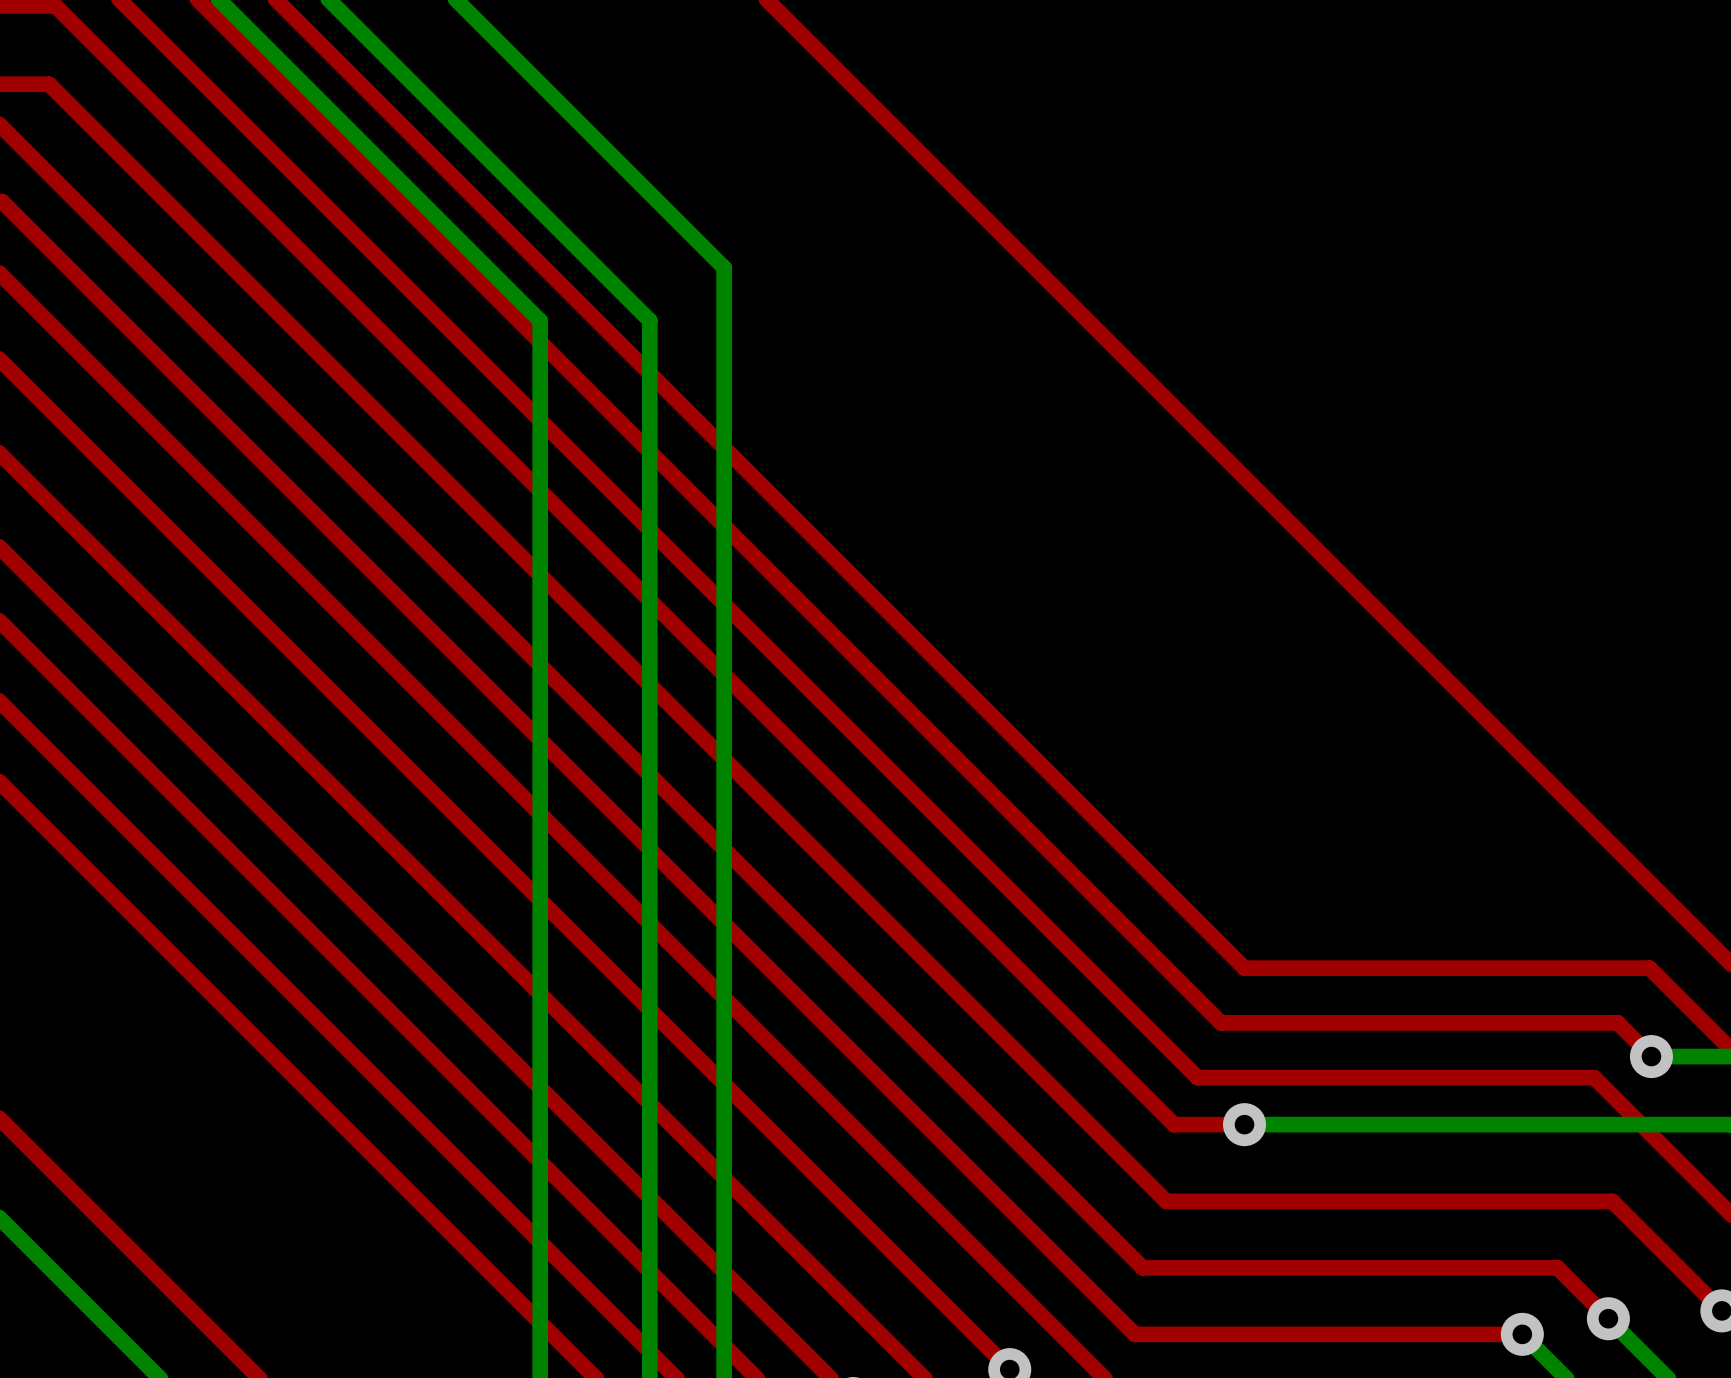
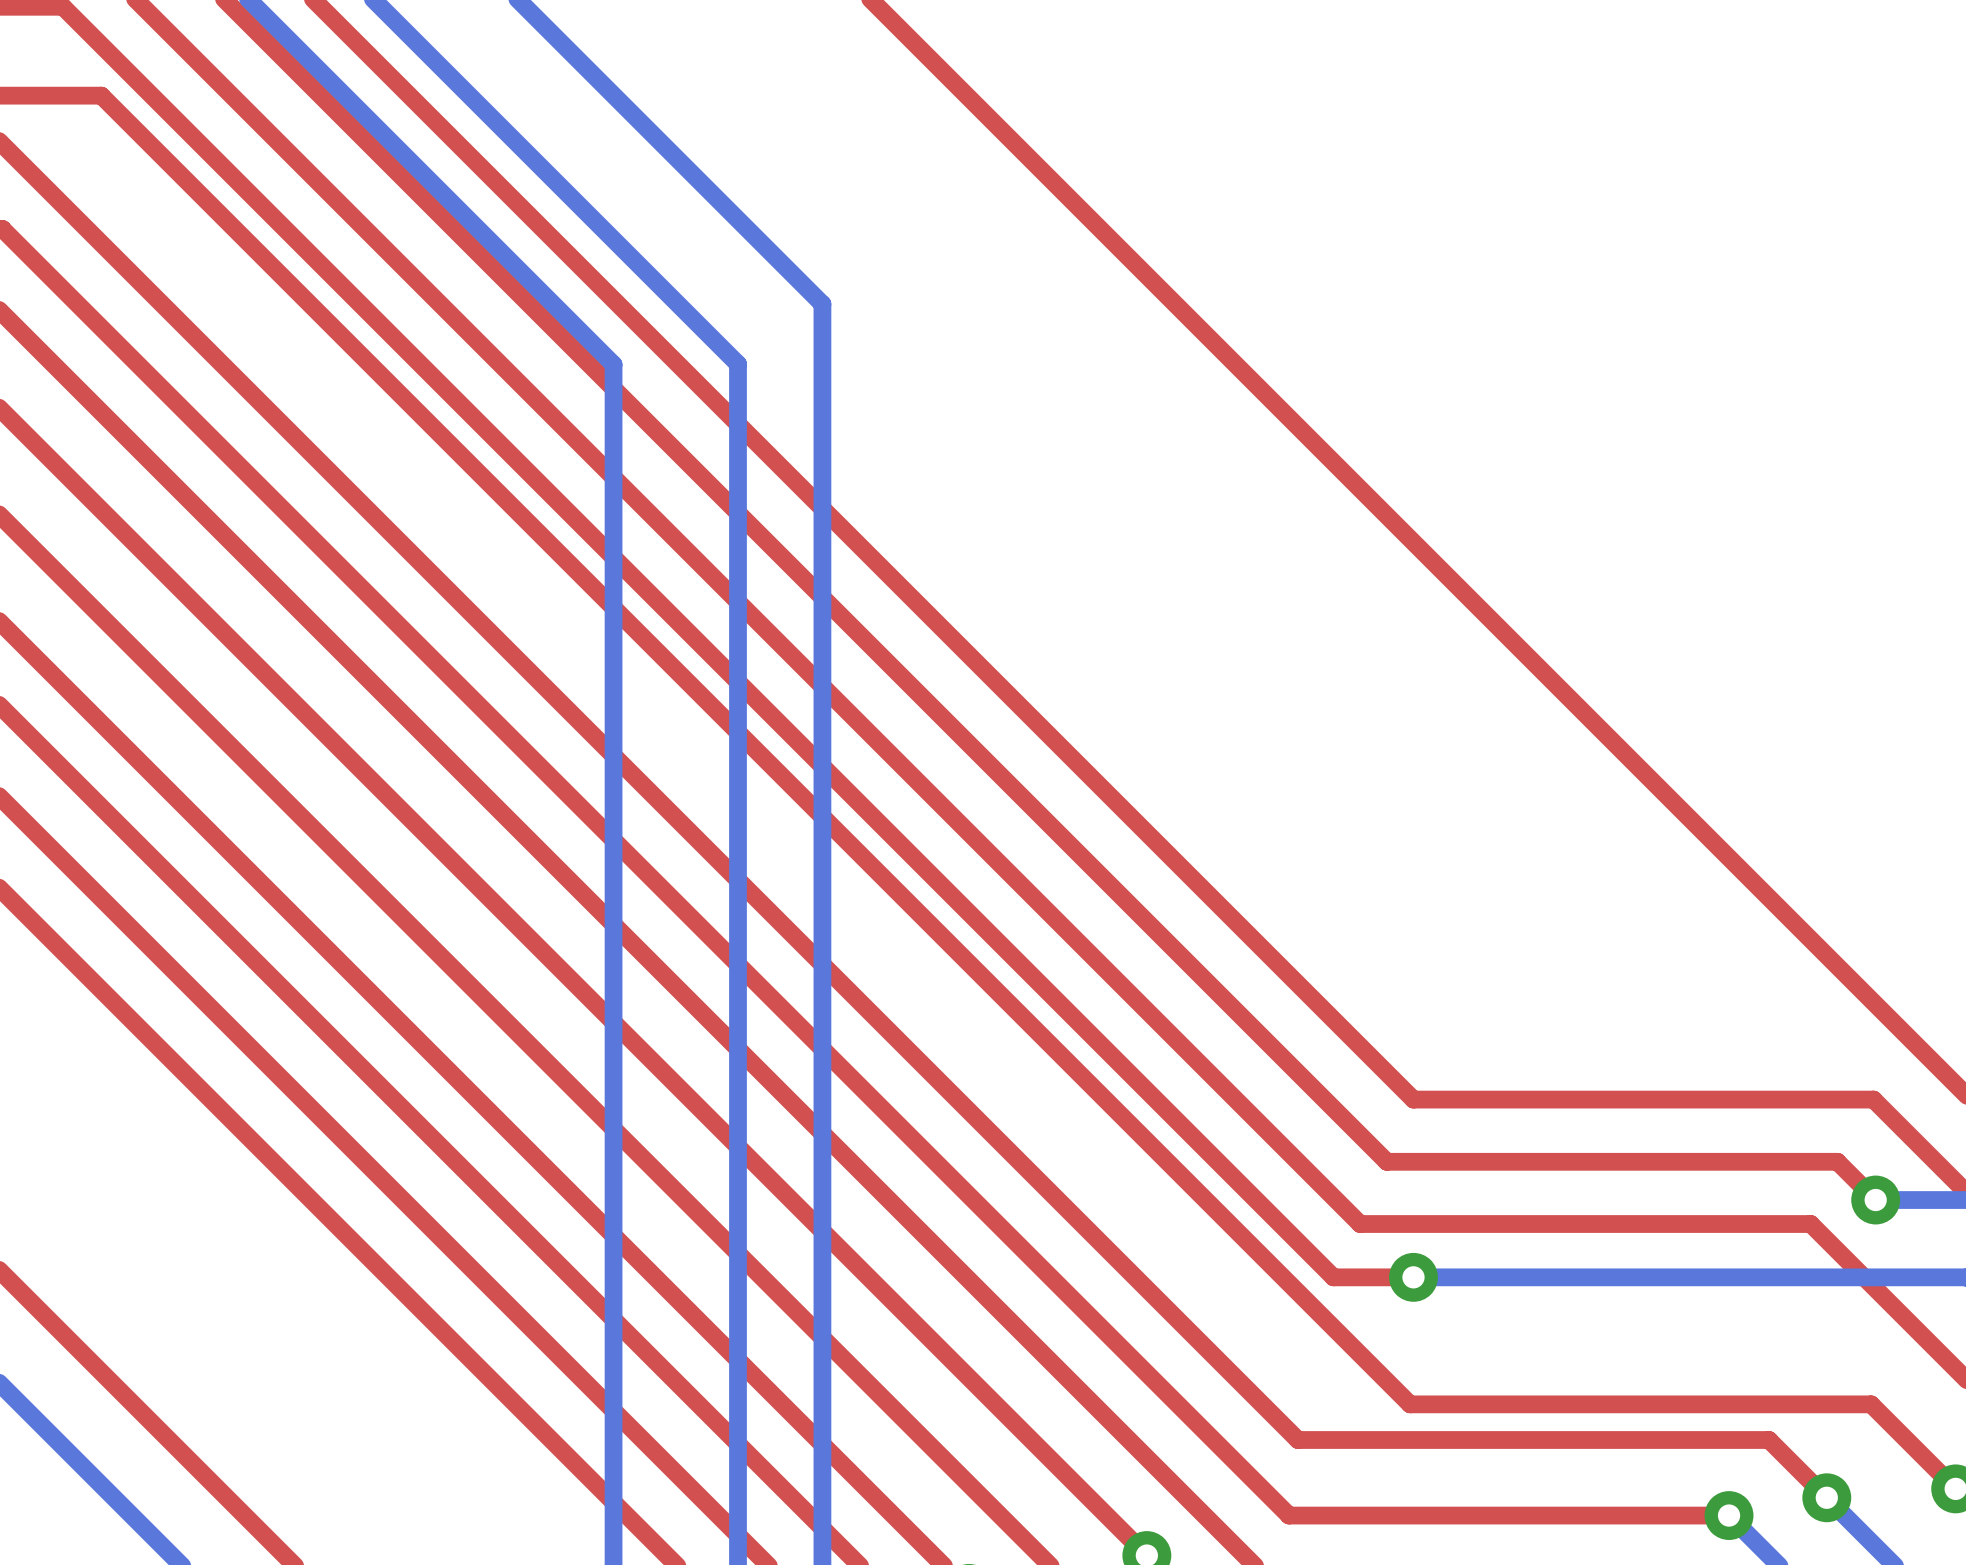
top track: (49, 84) (1166, 1201) (1612, 1201) (1647, 1236) -> (55, 95) (101, 95) (1410, 1404) (1871, 1404)

